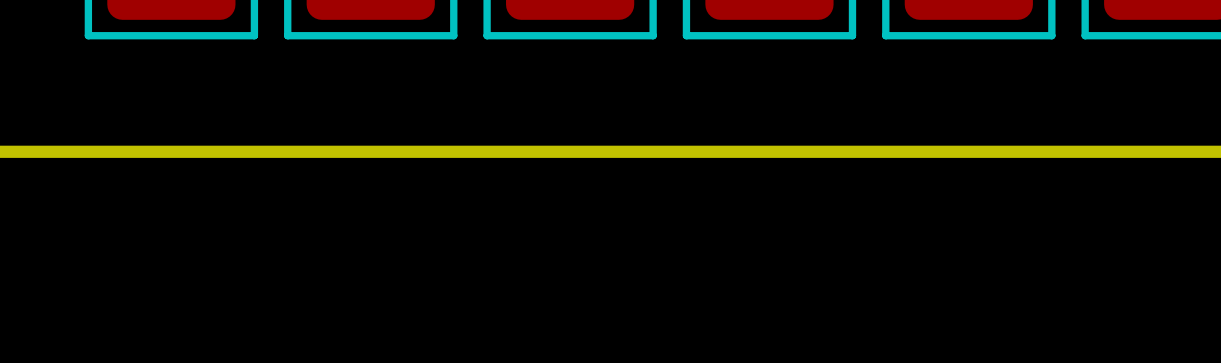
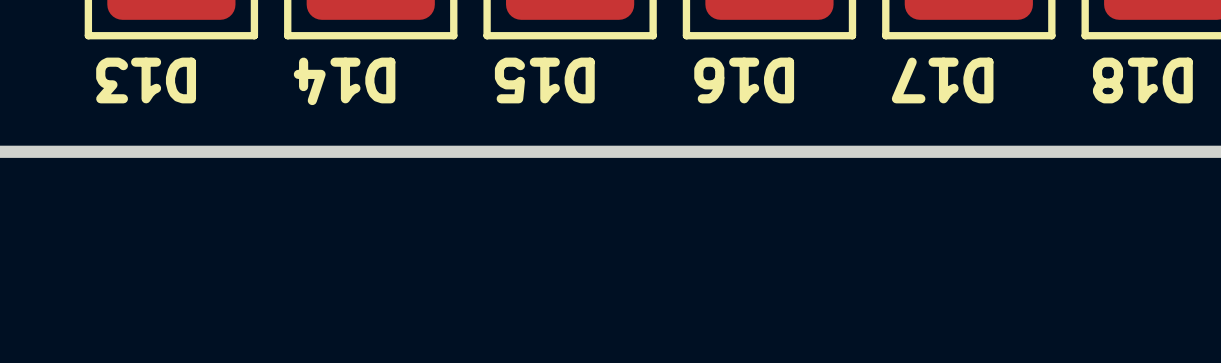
D13 name: none -> D13 (146, 80)
D15 name: none -> D15 (544, 80)
D16 name: none -> D16 (744, 80)
D17 name: none -> D17 (942, 80)
D18 name: none -> D18 (1142, 80)
D14 name: none -> D14 (344, 81)

